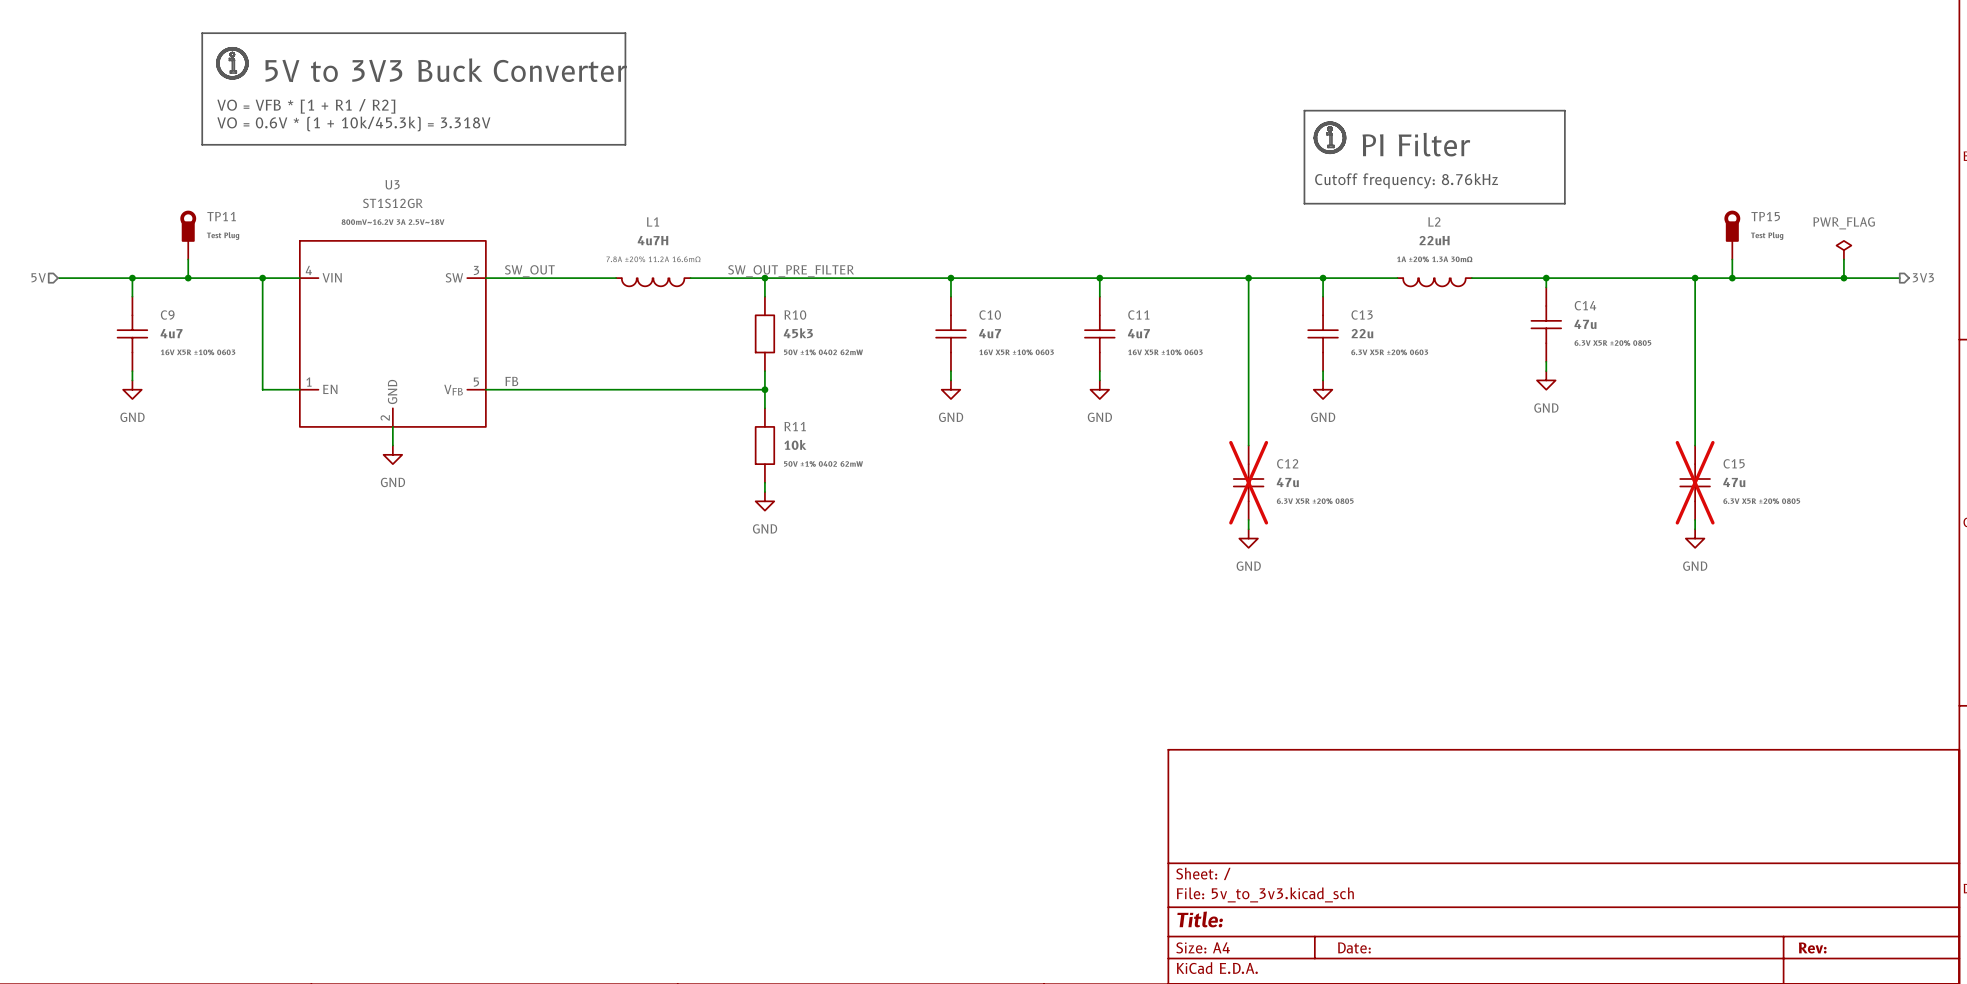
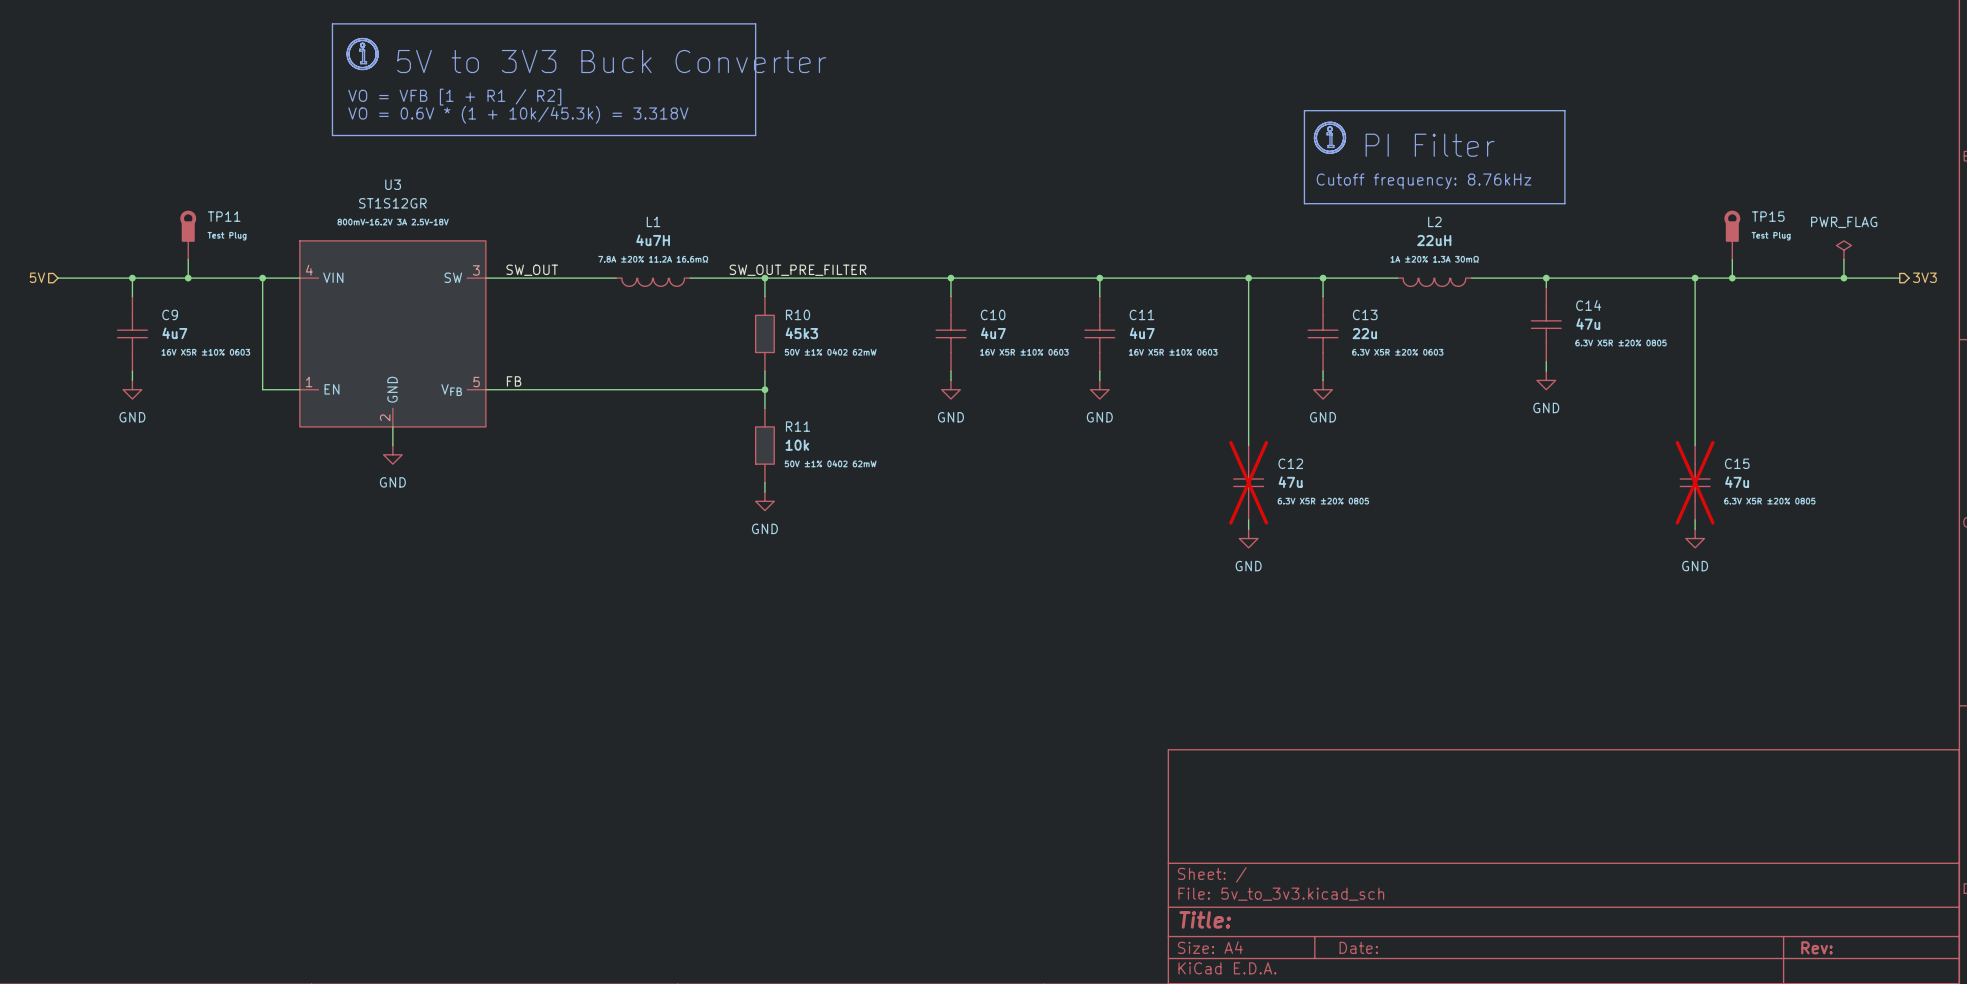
line: (202, 33) (625, 33) (625, 144) (202, 144) (202, 33) -> (332, 23) (755, 23) (755, 135) (332, 135) (332, 23)
line: (232, 47) (221, 52) (216, 62) (221, 74) (232, 78) (243, 74) (247, 63) (243, 52) (232, 47) -> none
line: none -> (347, 54) (351, 64) (362, 69) (373, 64) (378, 54) (373, 43) (362, 38) (351, 43) (347, 54)
line: (232, 58) (229, 58) (229, 60) (232, 60) (232, 71) (230, 73) (236, 73) (234, 71) (234, 60) -> (362, 49) (359, 49) (359, 51) (362, 51) (362, 61) (360, 63) (366, 63) (364, 61) (364, 51)
line: (218, 63) (223, 73) (233, 76) (242, 72) (245, 62) (241, 53) (231, 49) (222, 53) (218, 63) -> (349, 54) (353, 64) (363, 67) (372, 63) (376, 53) (371, 43) (361, 40) (353, 44) (349, 54)
text position: 5V to 3V3 Buck Converter (446, 70) -> 5V to 3V3 Buck Converter (611, 61)
text: VO = VFB * [1 + R1 / R2] (306, 106) -> VO = VFB [1 + R1 / R2] (454, 97)
text position: VO = 0.6V * (1 + 10k/45.3k) = 3.318V (353, 123) -> VO = 0.6V * (1 + 10k/45.3k) = 3.318V (518, 114)

